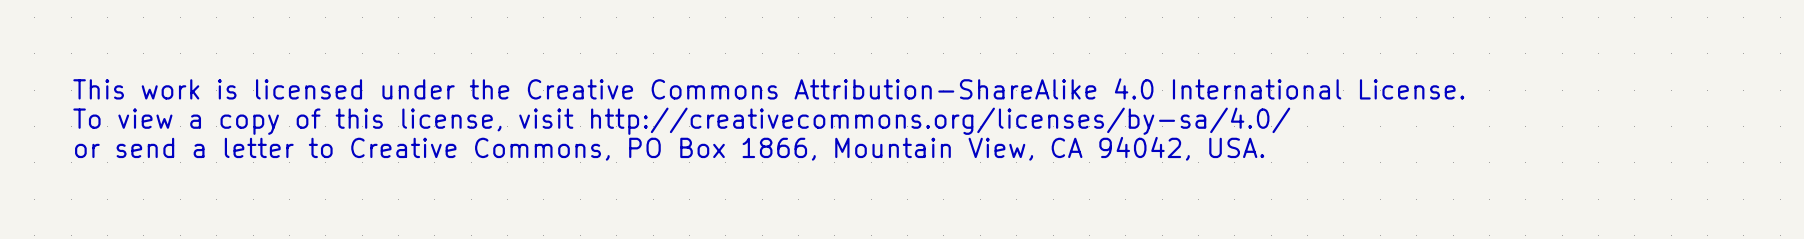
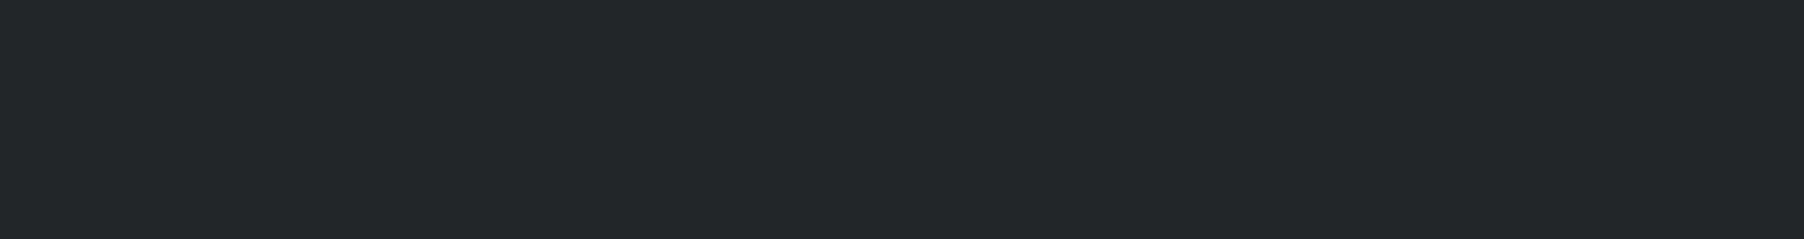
text: This work is licensed under the Creative Commons Attribution-ShareAlike 4.0 International License. (768, 88) -> none
text: To view a copy of this license, visit http://creativecommons.org/licenses/by-sa/4.0/ (681, 121) -> none
text: or send a letter to Creative Commons, PO Box 1866, Mountain View, CA 94042, USA. (669, 148) -> none

